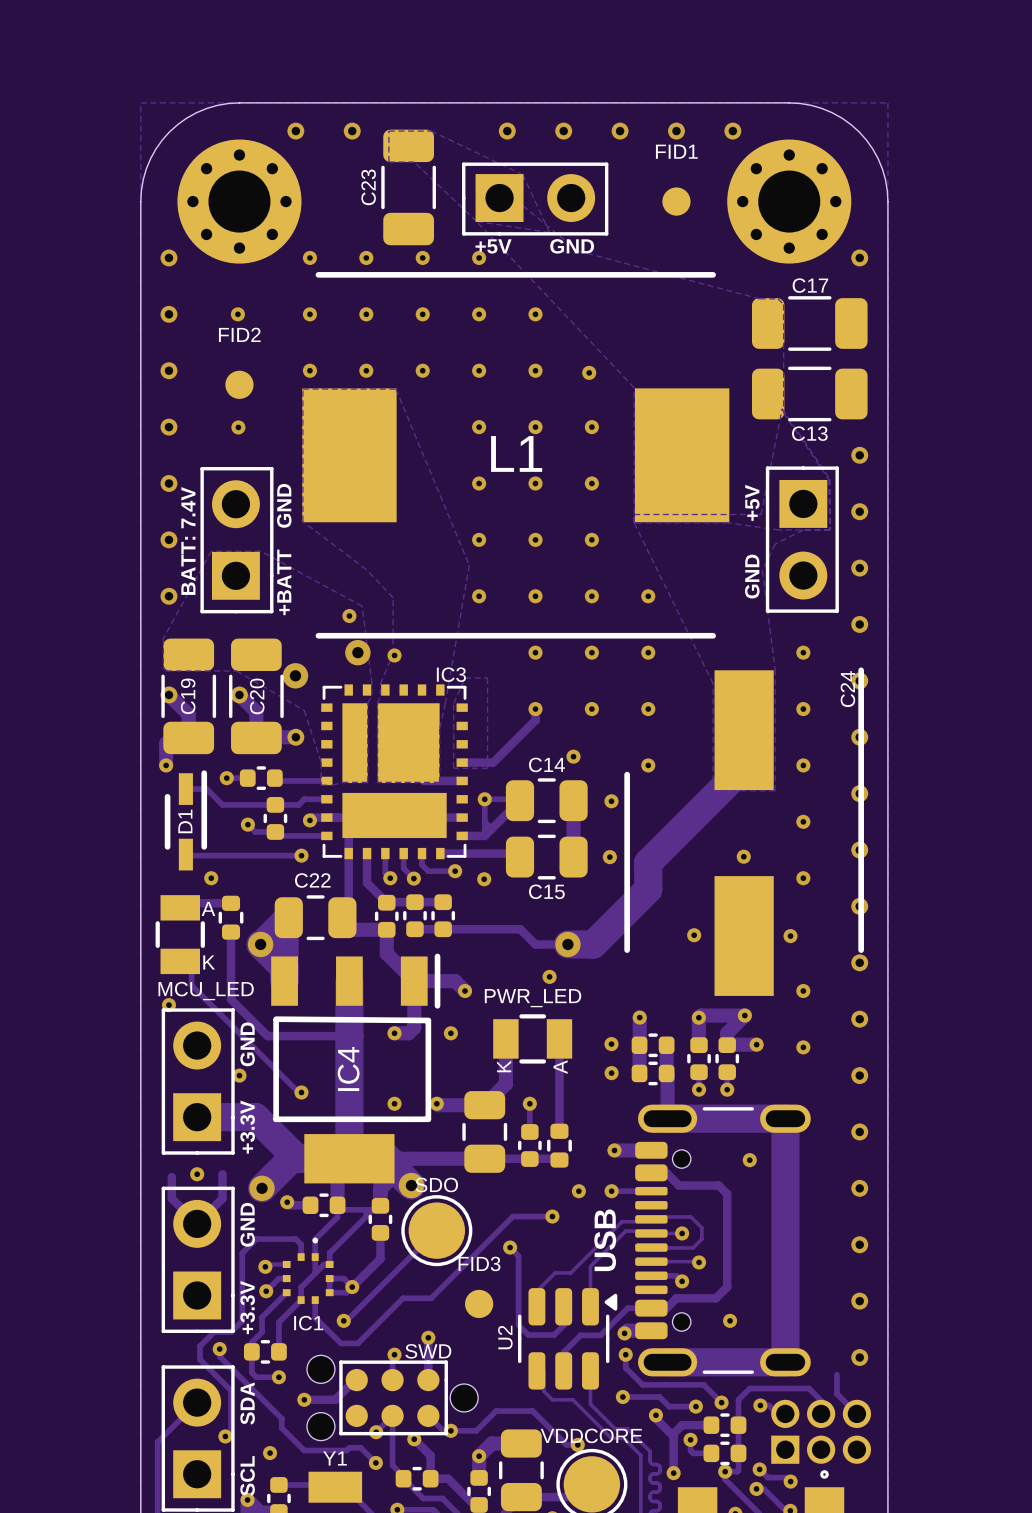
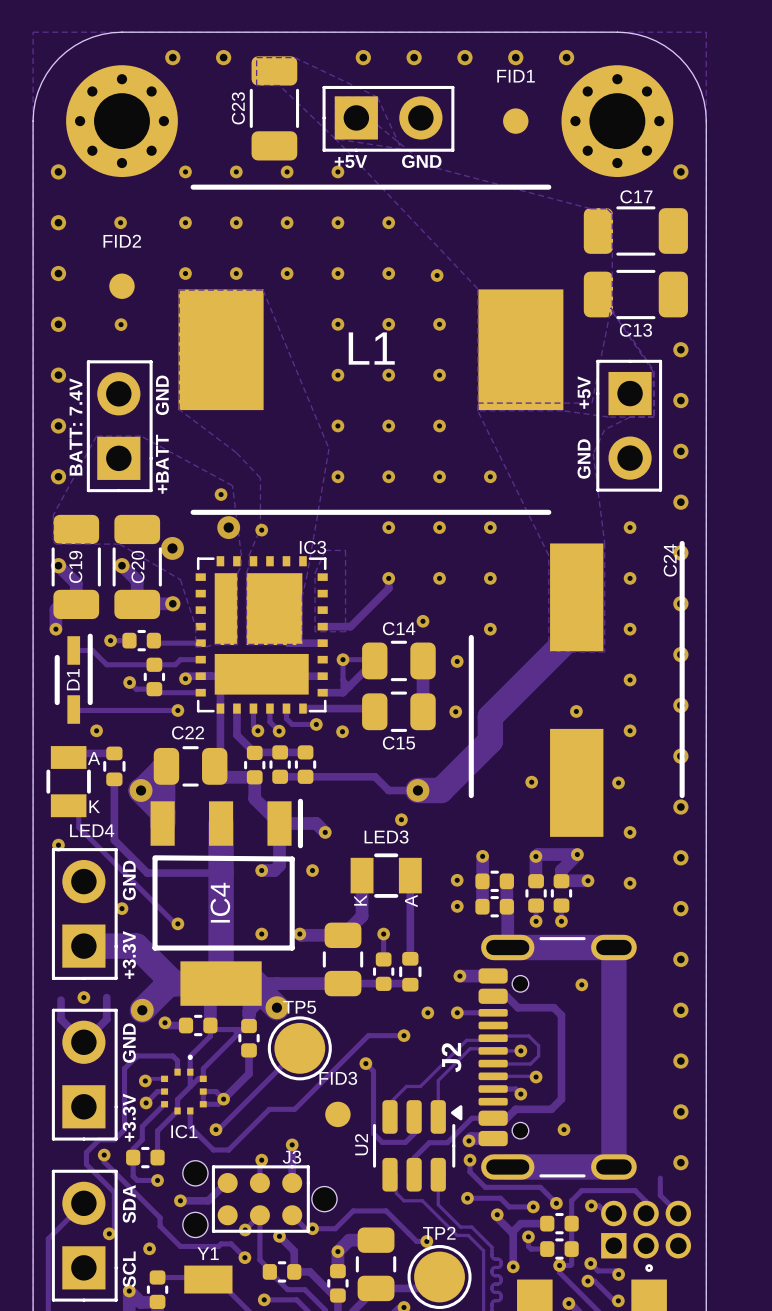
MCU_LED name: MCU_LED (206, 991) -> LED4 (92, 830)
PWR_LED name: PWR_LED (533, 998) -> LED3 (386, 837)
SDO name: SDO (436, 1185) -> TP5 (299, 1007)
USB name: USB (605, 1240) -> J2 (451, 1057)
SWD name: SWD (428, 1351) -> J3 (291, 1157)
VDDCORE name: VDDCORE (591, 1435) -> TP2 (439, 1233)

